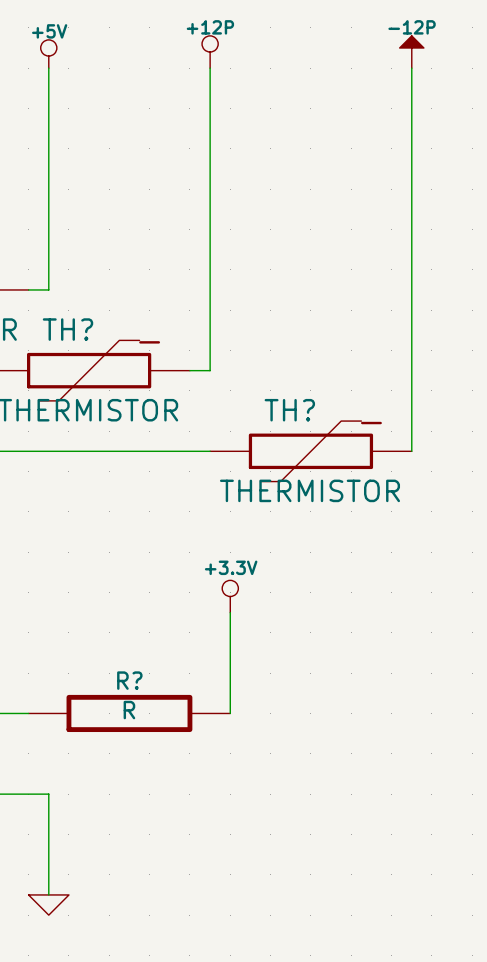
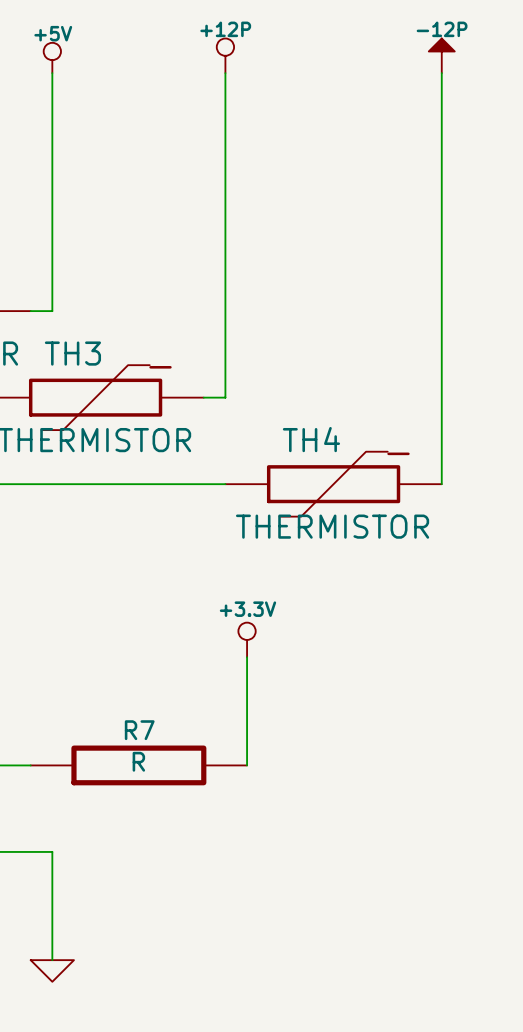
TH? name: TH? (67, 329) -> TH3 (72, 353)
TH? name: TH? (289, 410) -> TH4 (311, 439)
R? name: R? (129, 680) -> R7 (139, 730)

